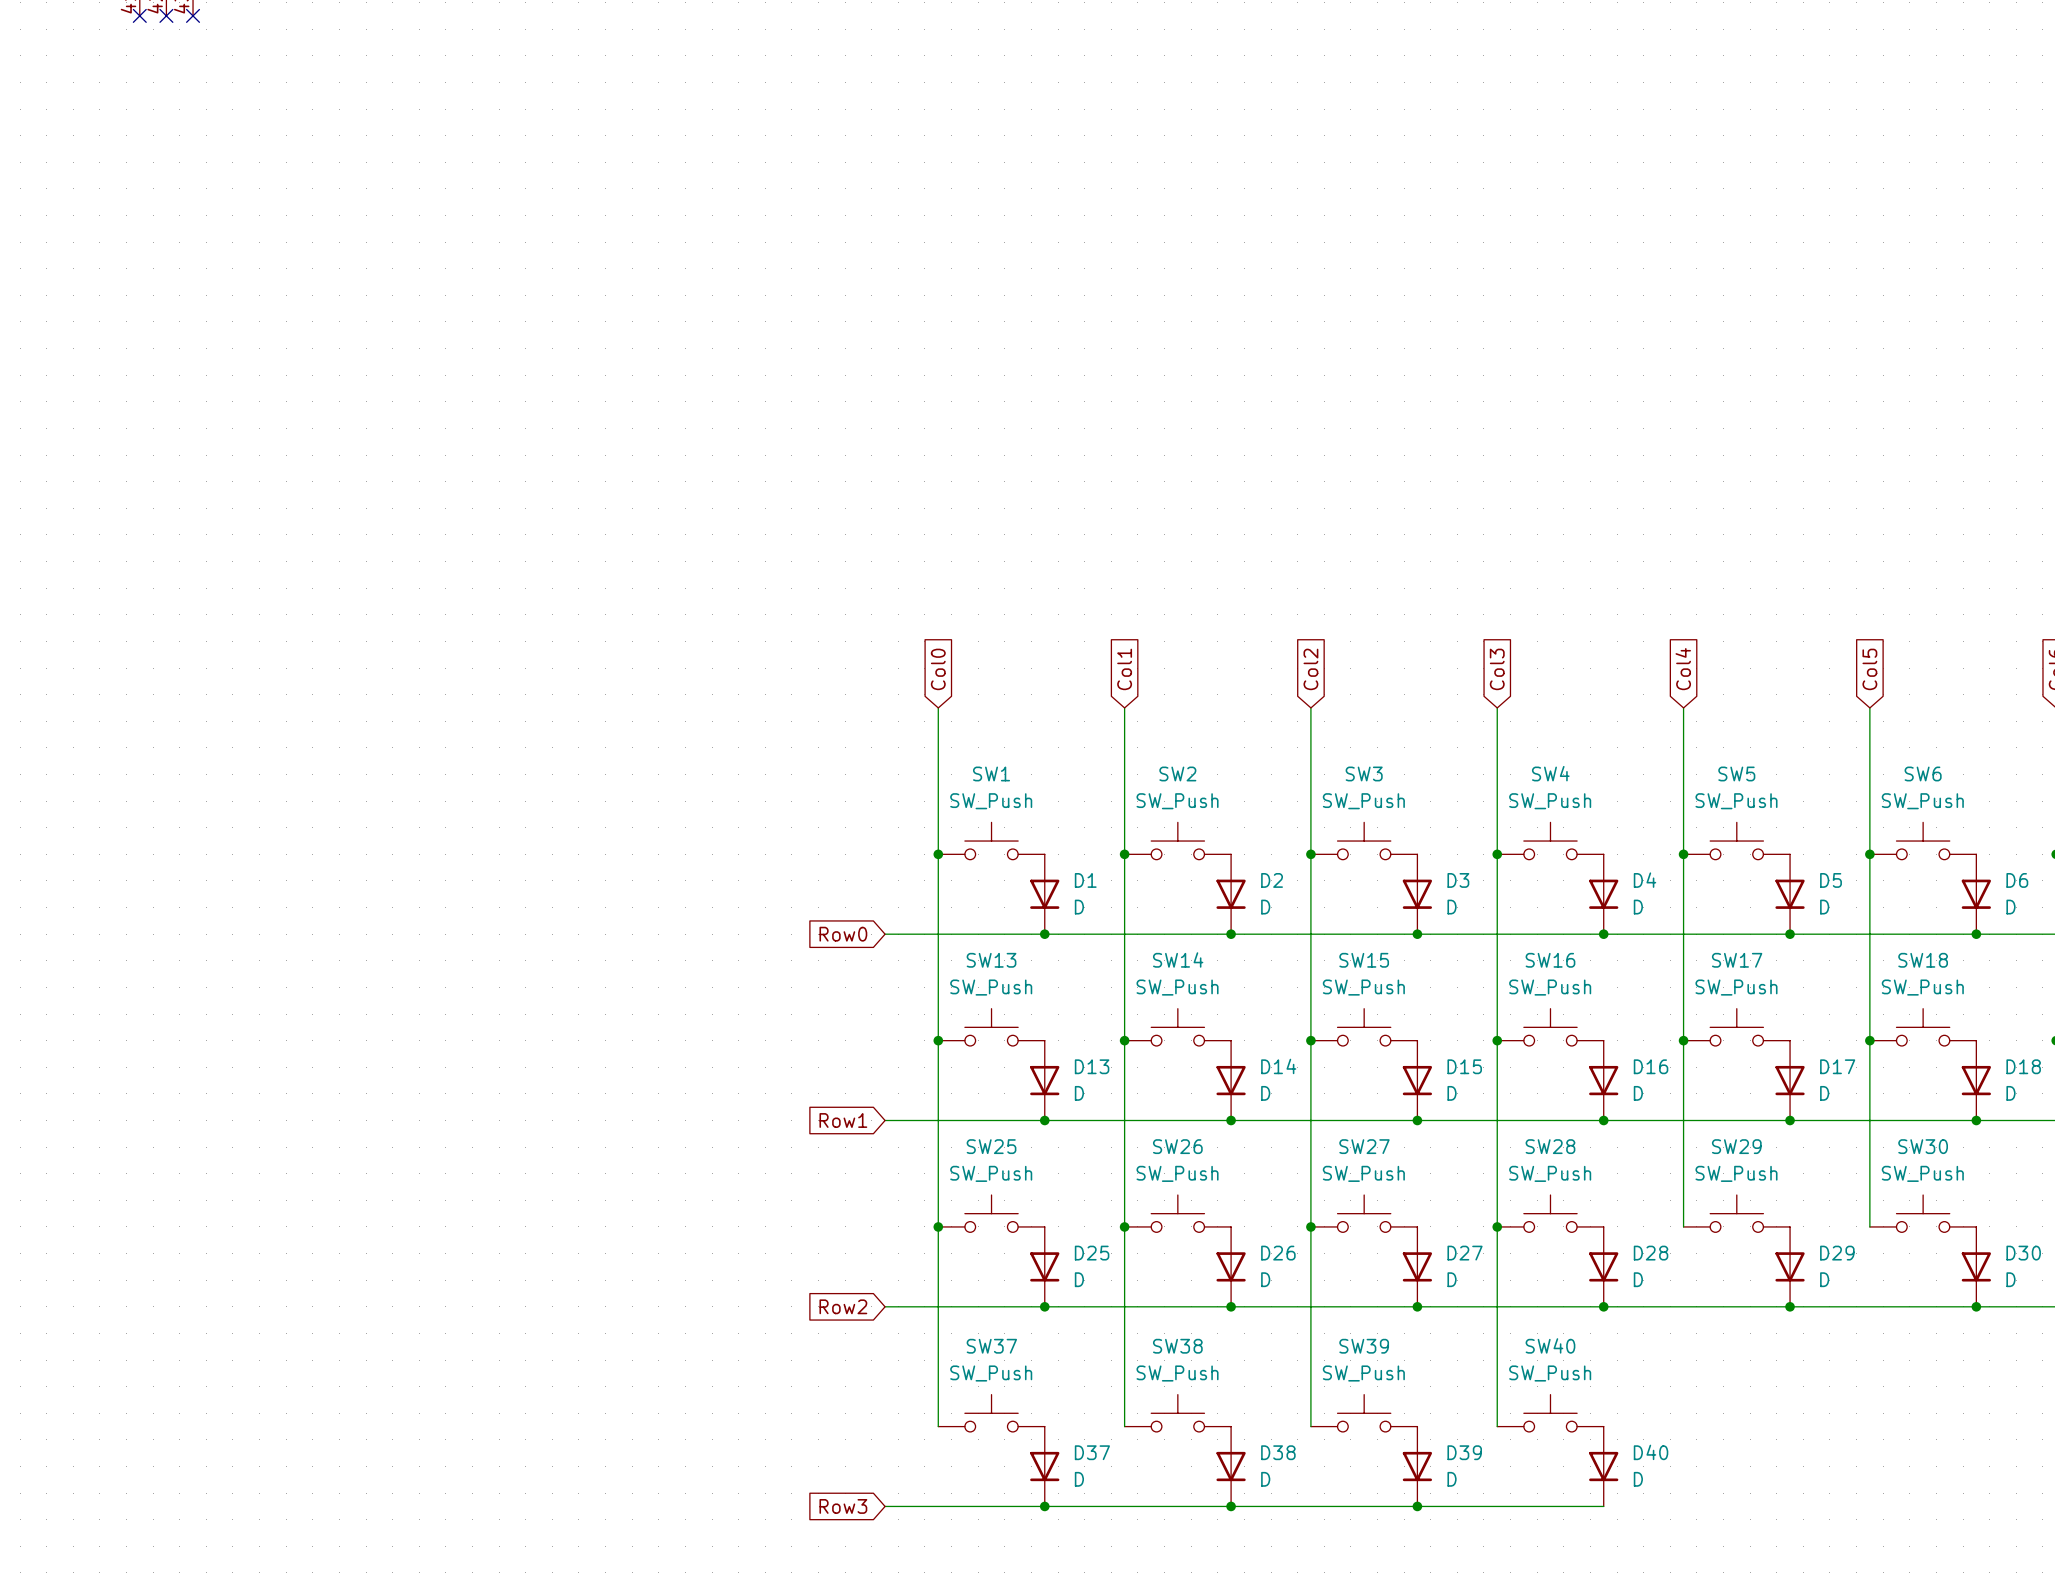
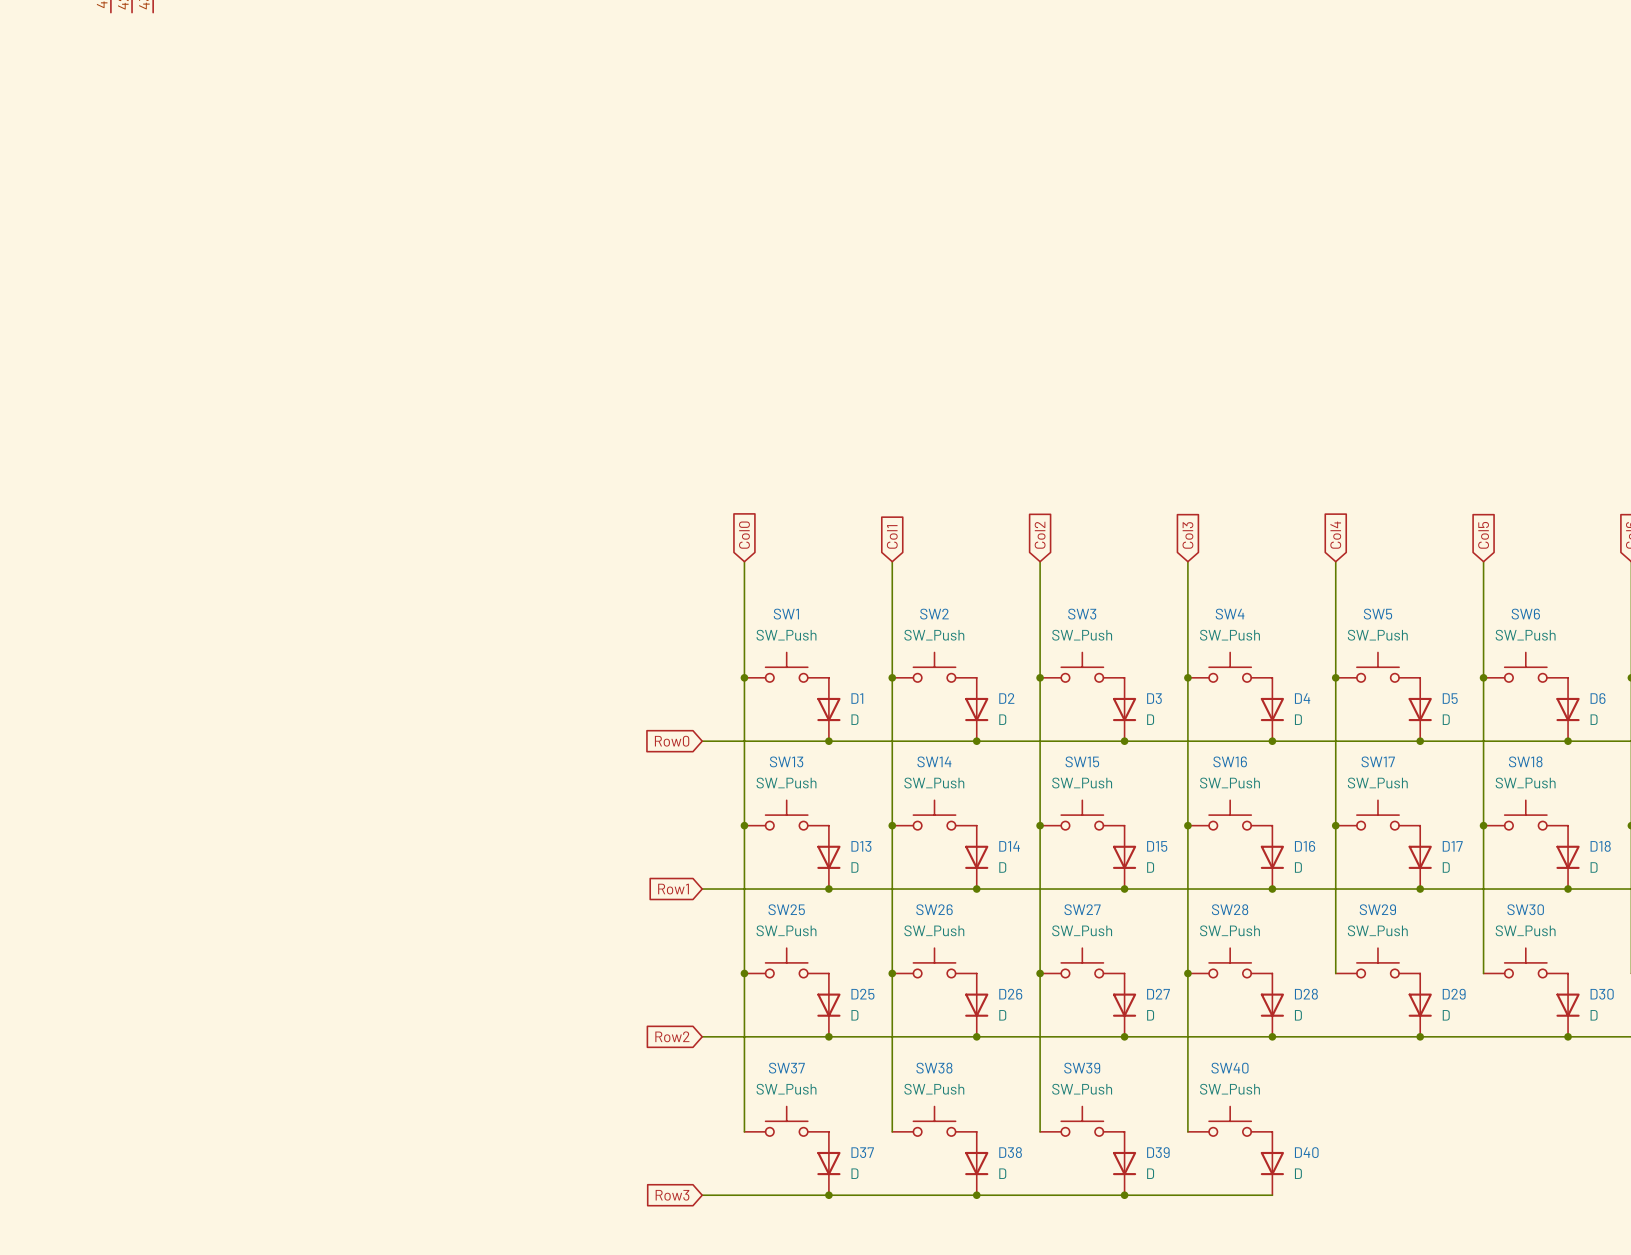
no-connect mark: (139, 15) -> none
no-connect mark: (166, 15) -> none
no-connect mark: (193, 15) -> none

